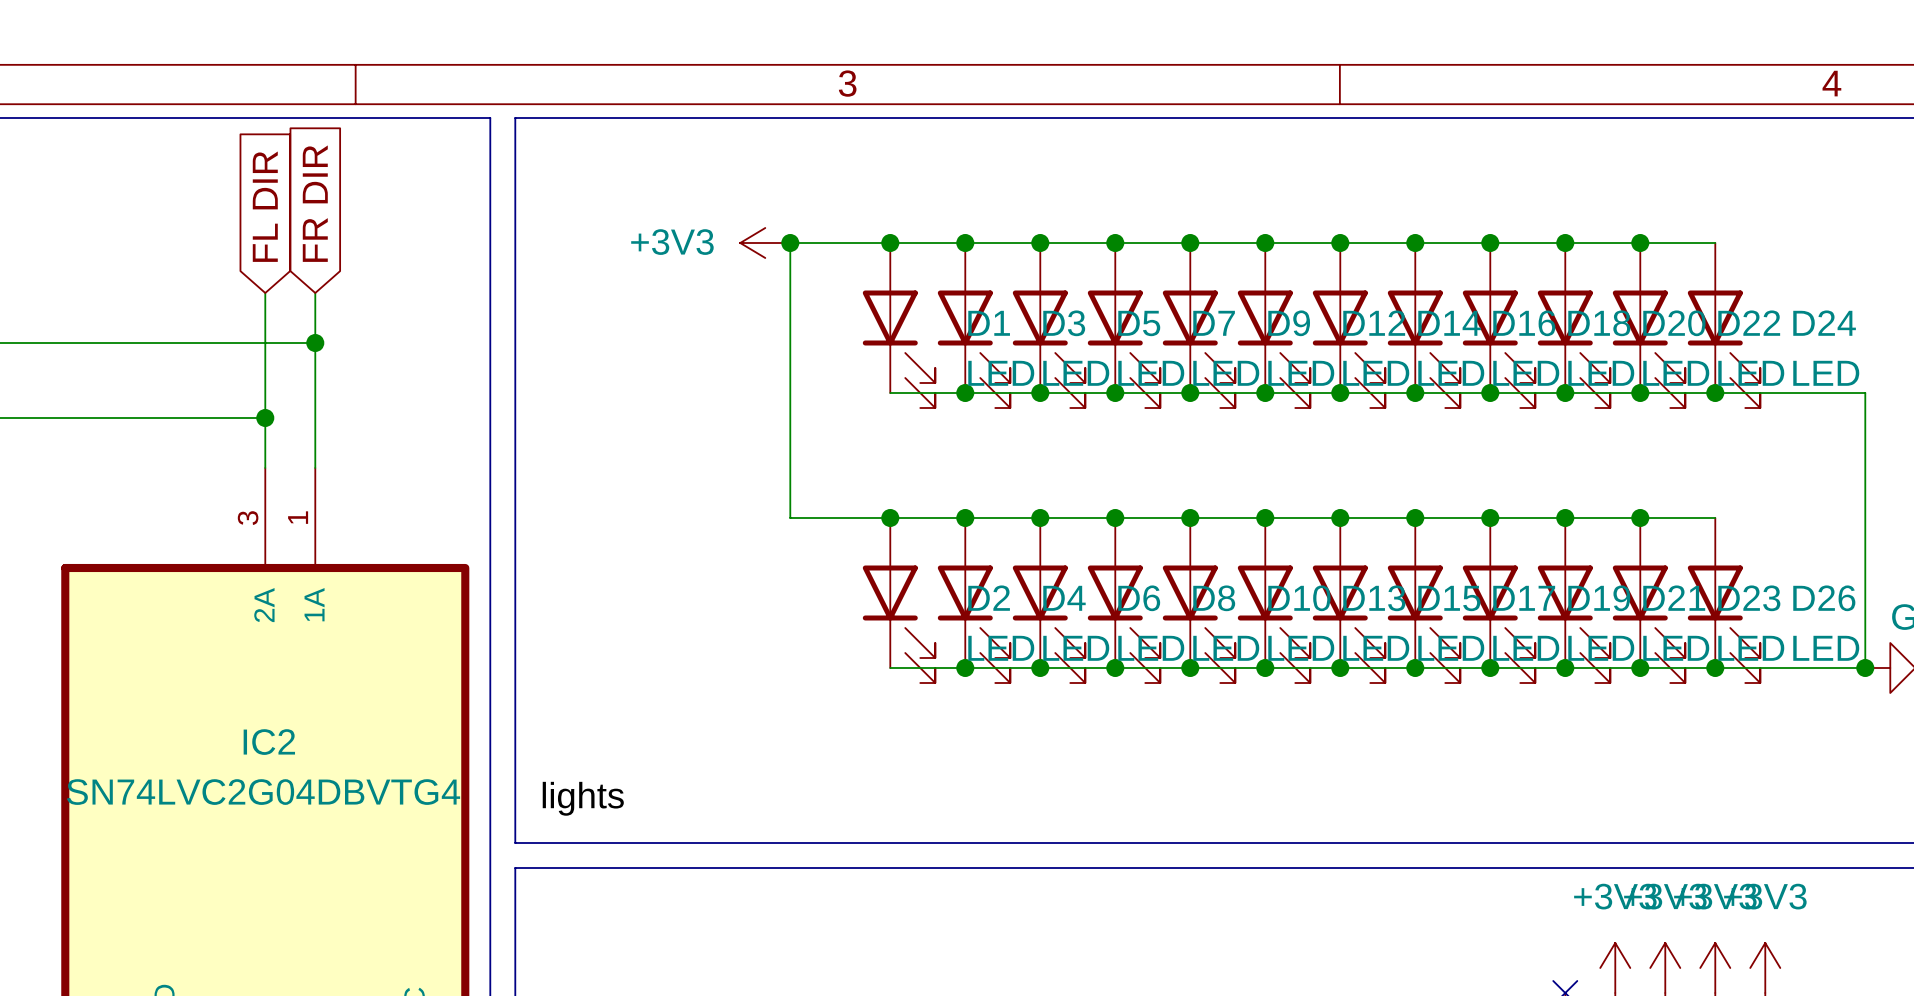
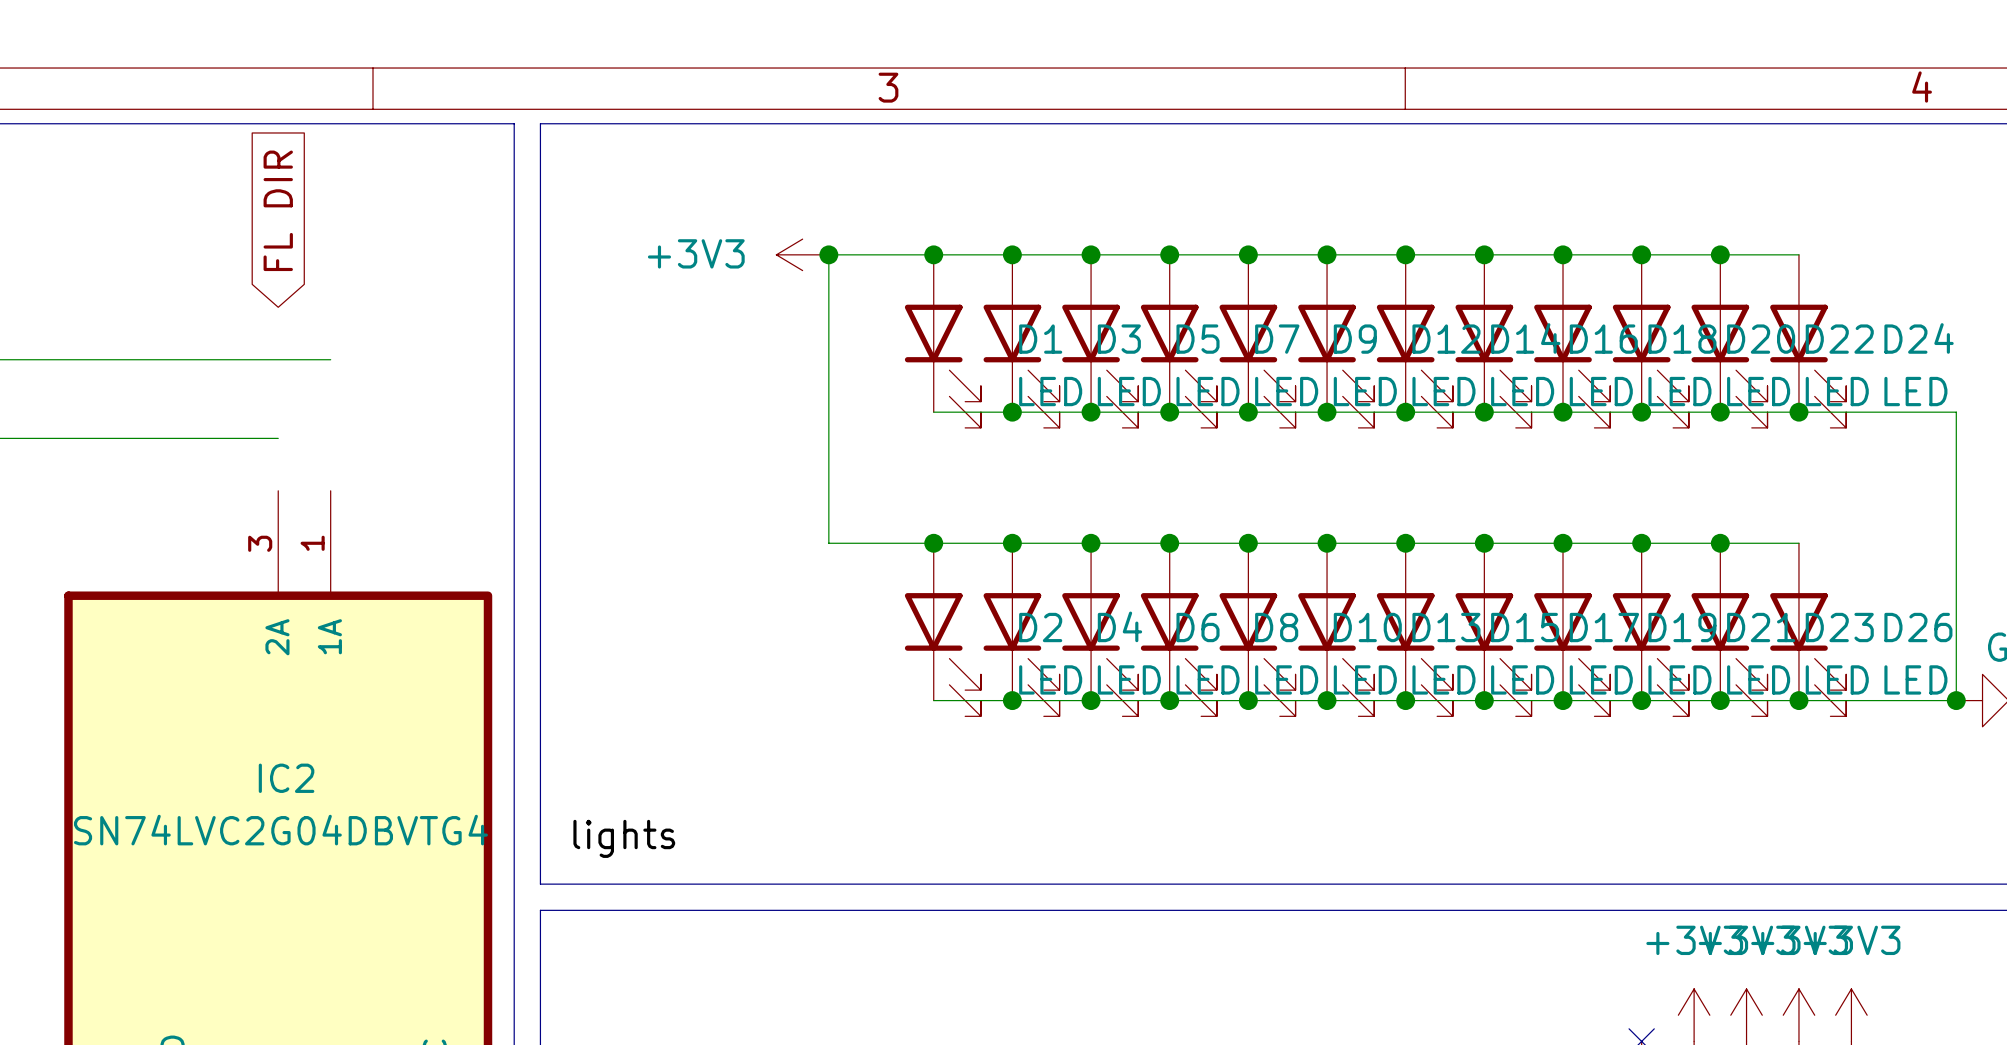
global label: FR DIR (315, 203) -> none
wire: (265, 293) (265, 467) -> none
wire: (315, 293) (315, 467) -> none
junction: (315, 342) -> none
junction: (265, 417) -> none

